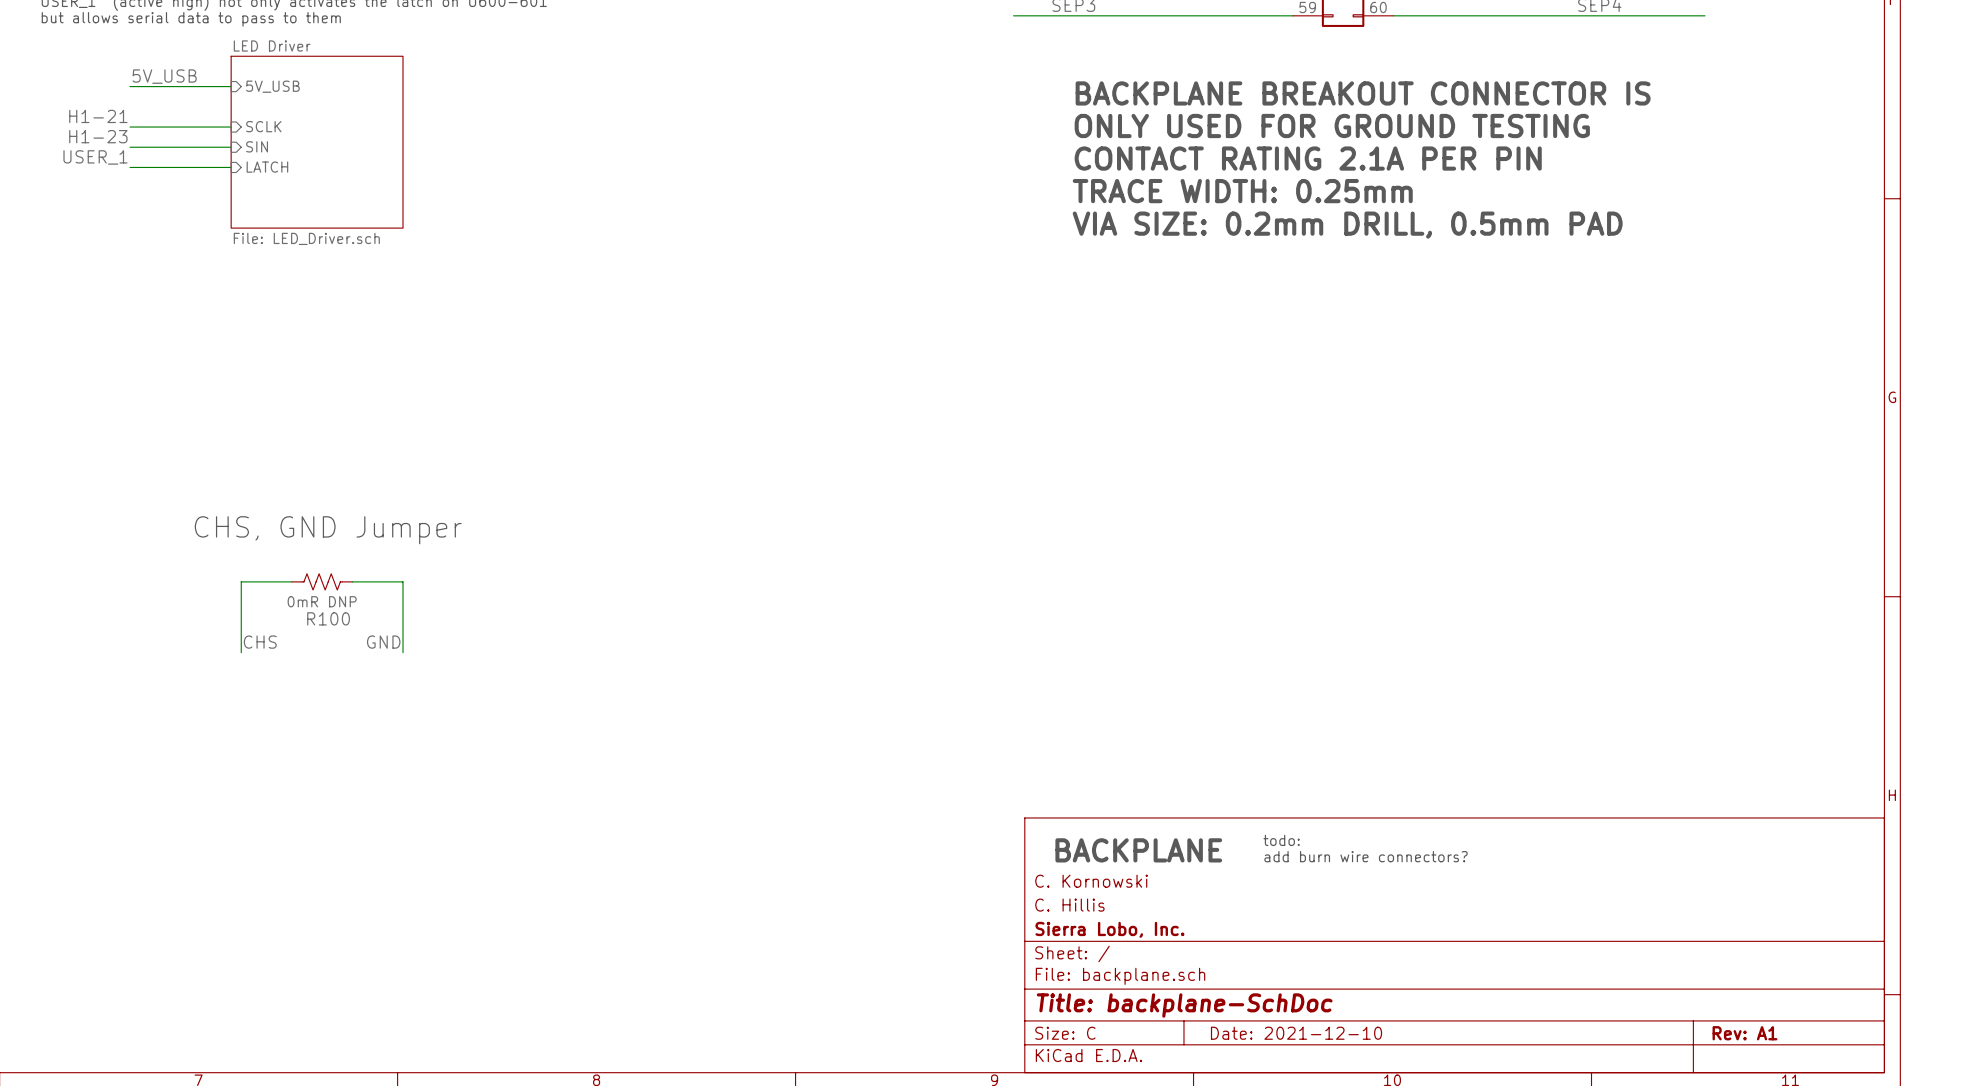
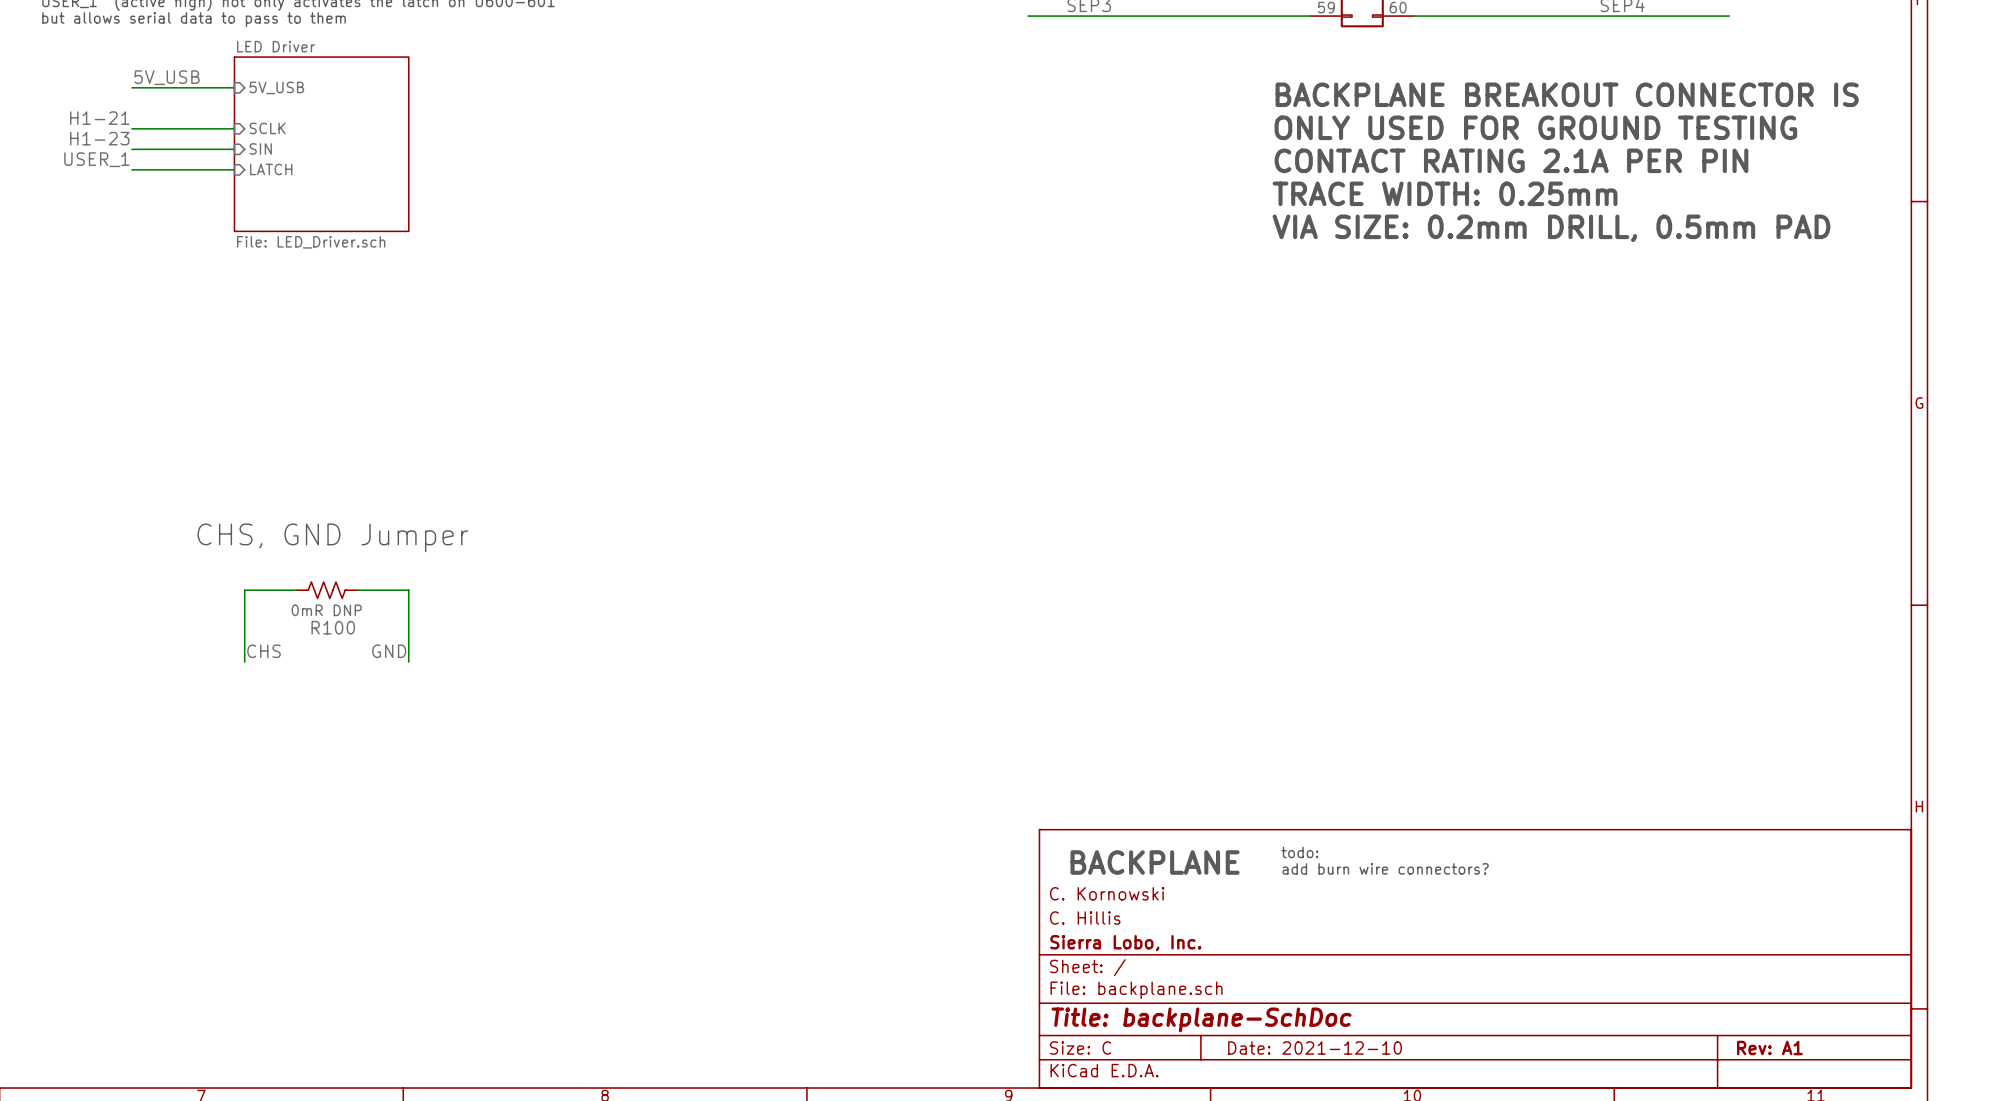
text position: BACKPLANE BREAKOUT CONNECTOR IS (1363, 93) -> BACKPLANE BREAKOUT CONNECTOR IS (1567, 94)
text position: ONLY USED FOR GROUND TESTING (1332, 125) -> ONLY USED FOR GROUND TESTING (1535, 127)
text position: CONTACT RATING 2.1A PER PIN (1308, 158) -> CONTACT RATING 2.1A PER PIN (1511, 160)
text position: TRACE WIDTH: 0.25mm (1242, 191) -> TRACE WIDTH: 0.25mm (1445, 193)
text position: VIA SIZE: 0.2mm DRILL, 0.5mm PAD (1347, 225) -> VIA SIZE: 0.2mm DRILL, 0.5mm PAD (1551, 228)

